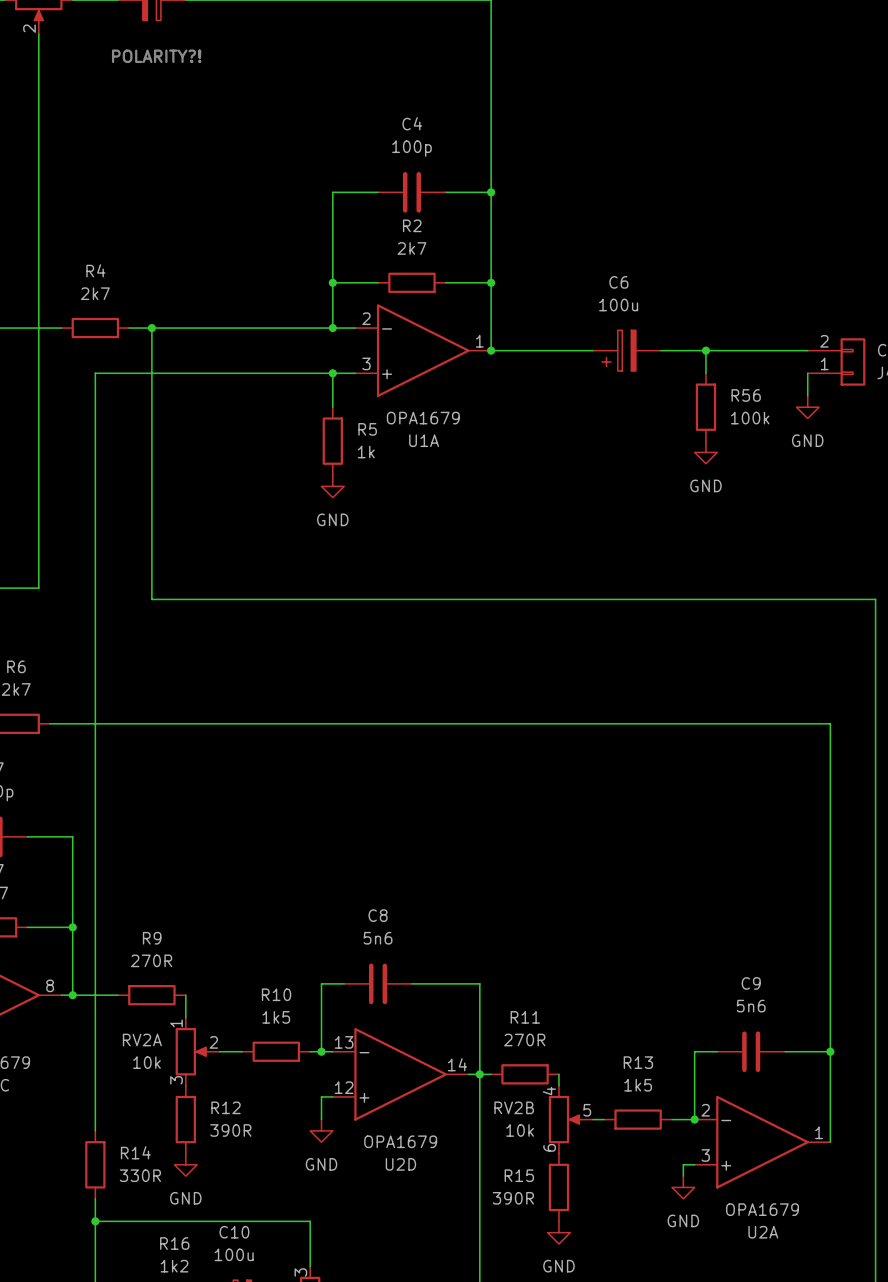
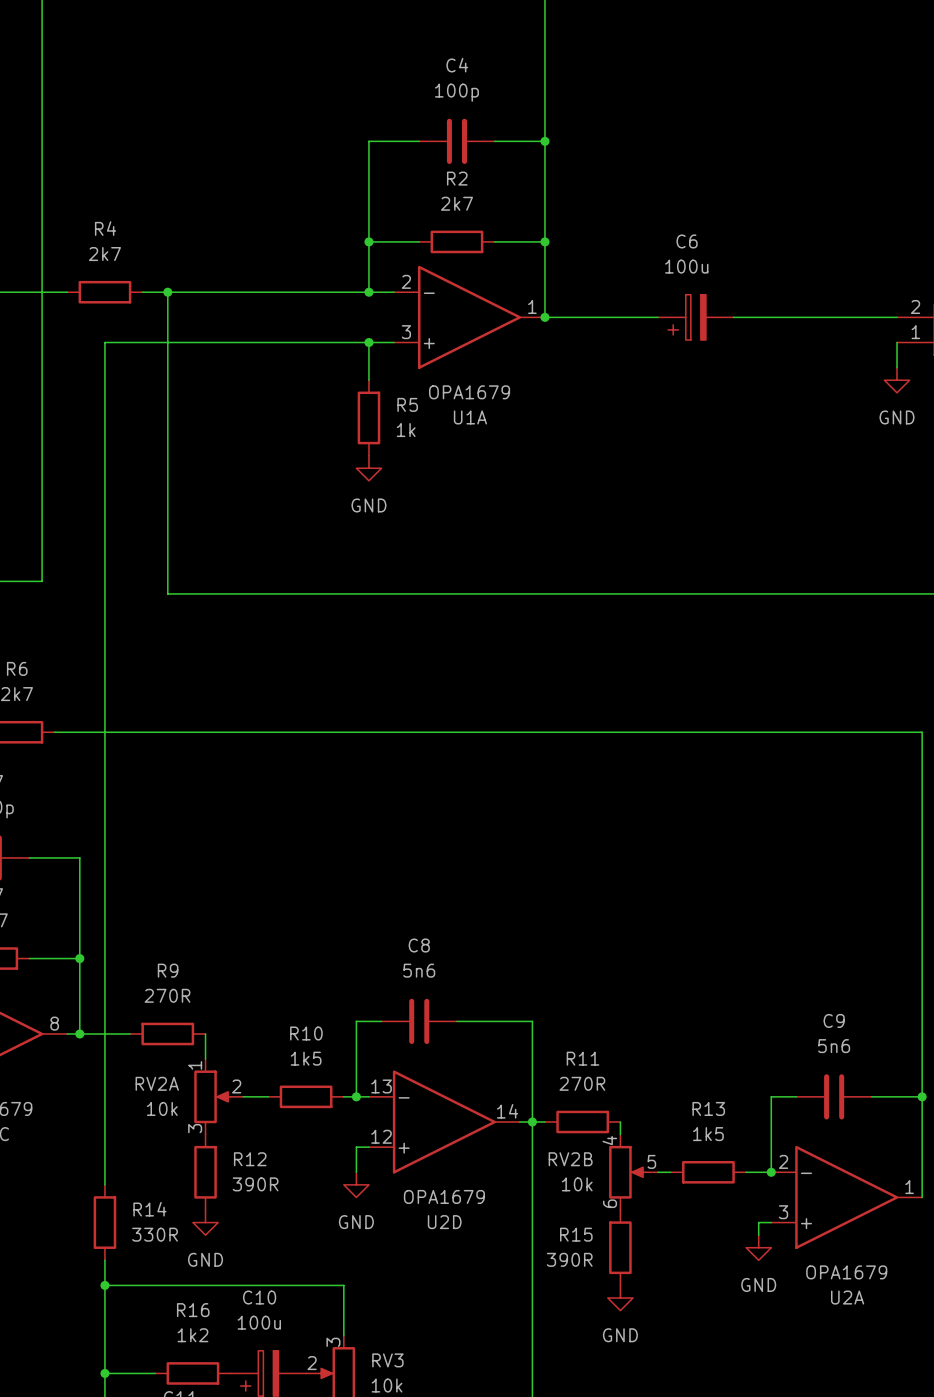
wire: (705, 350) (705, 373) -> none
junction: (705, 350) -> none
R56: 100k (705, 407) -> none
power symbol: GND (705, 452) -> none

